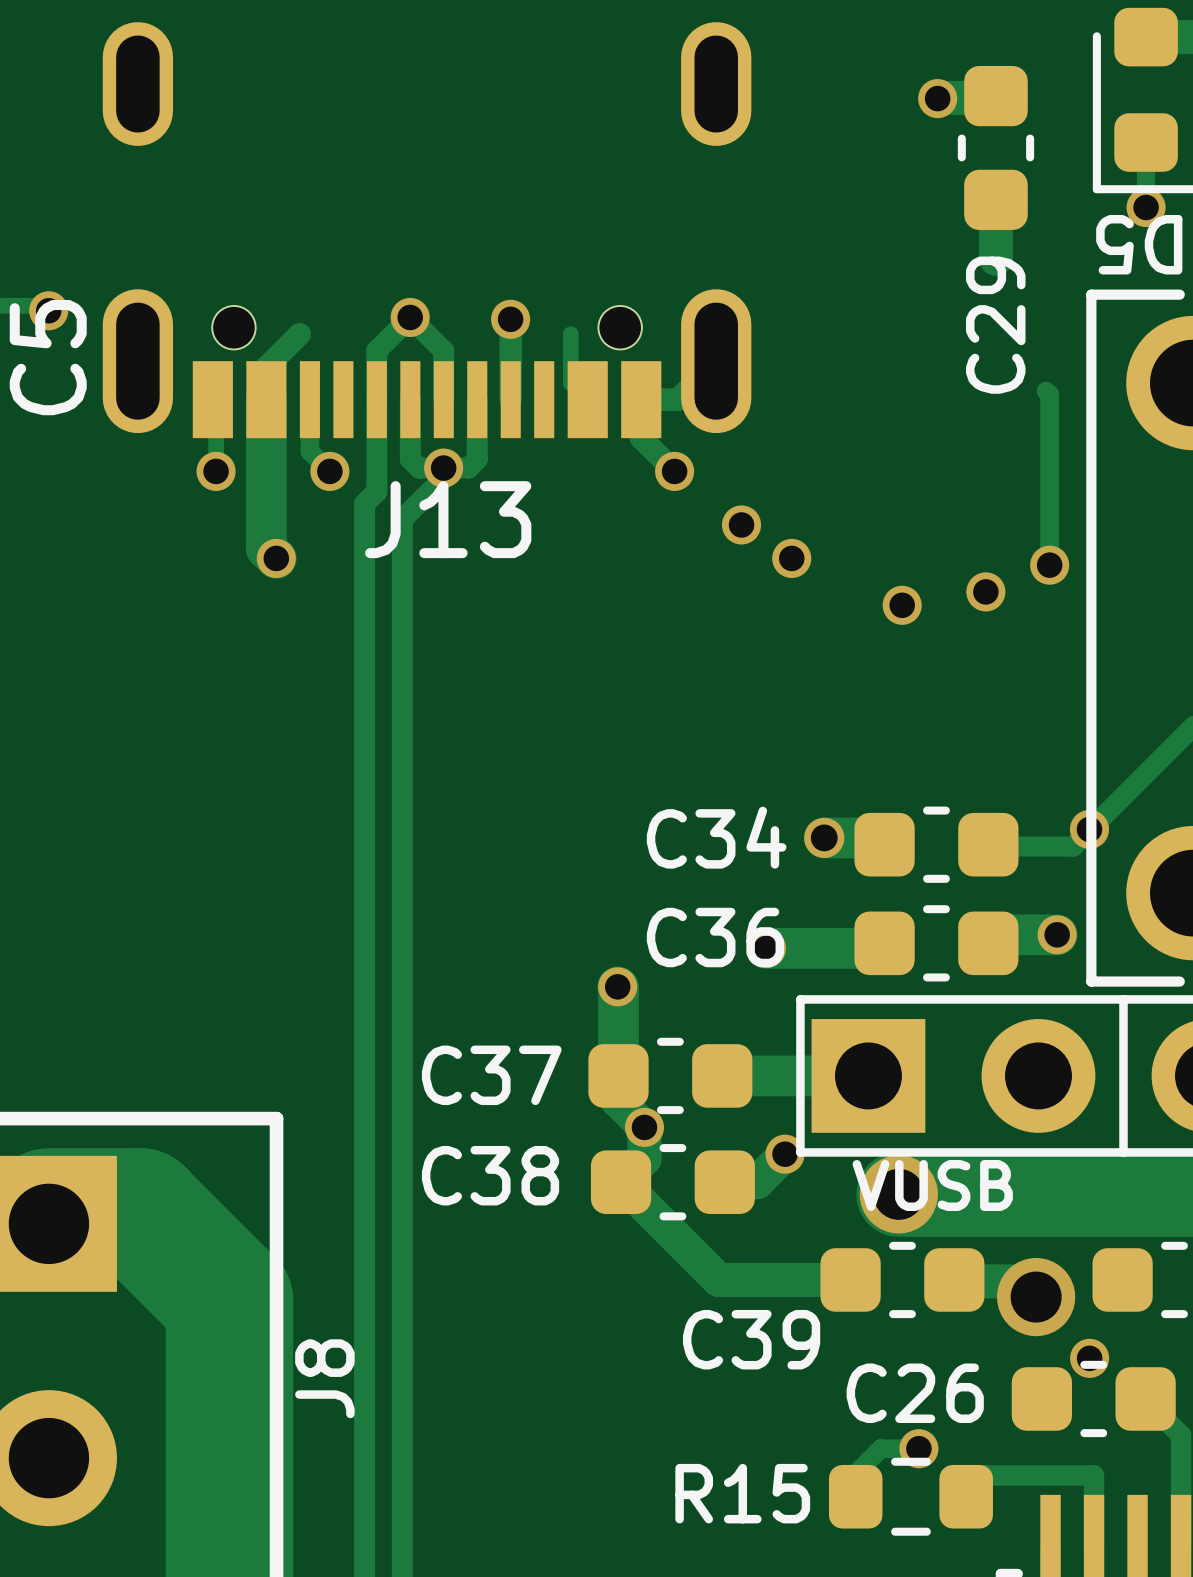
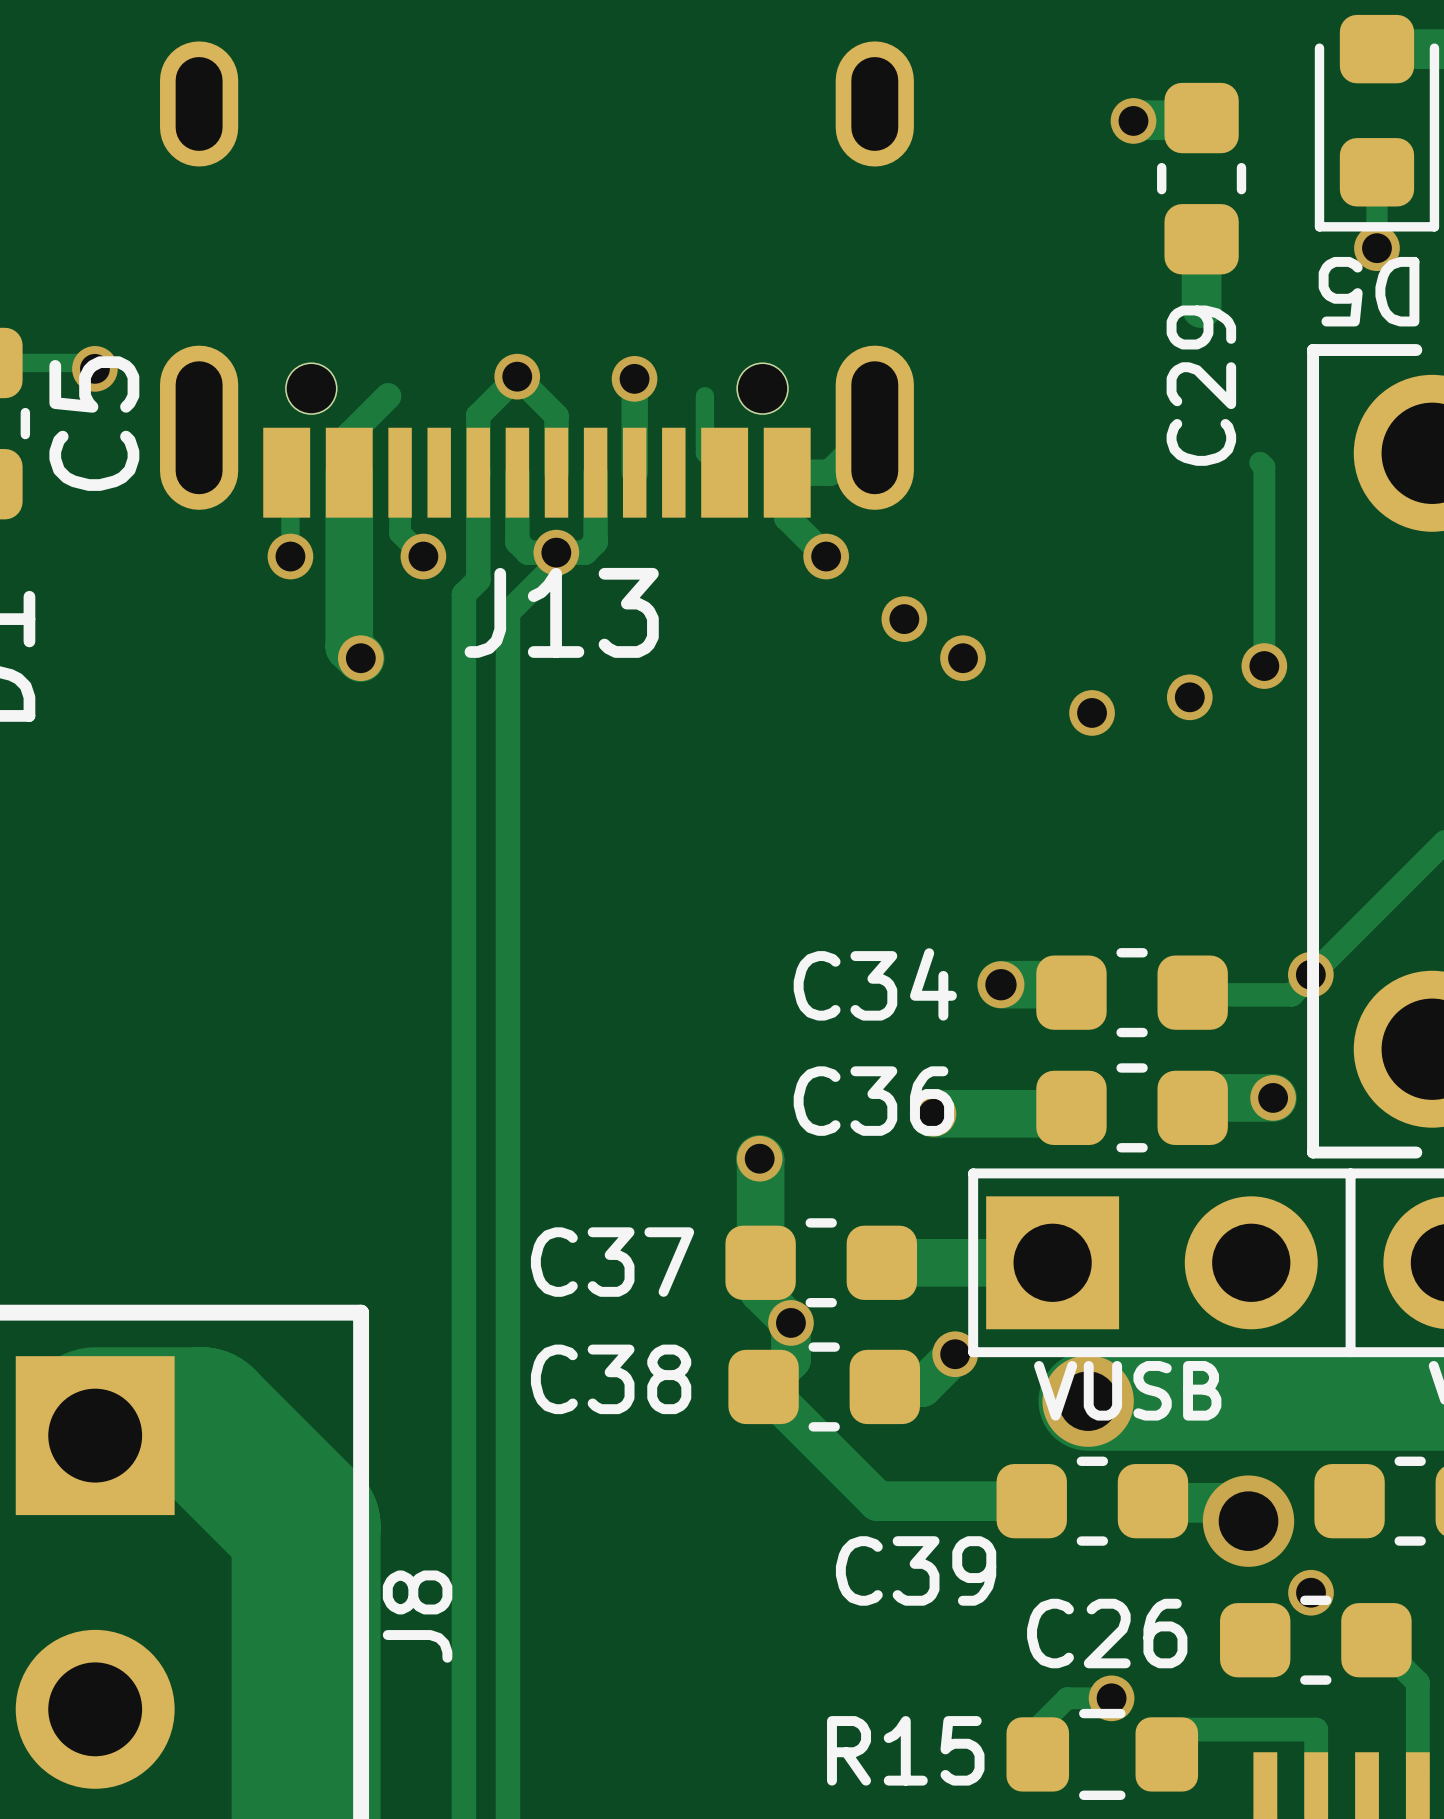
J13 footprint: [102, 22, 752, 439] -> [160, 41, 914, 518]

